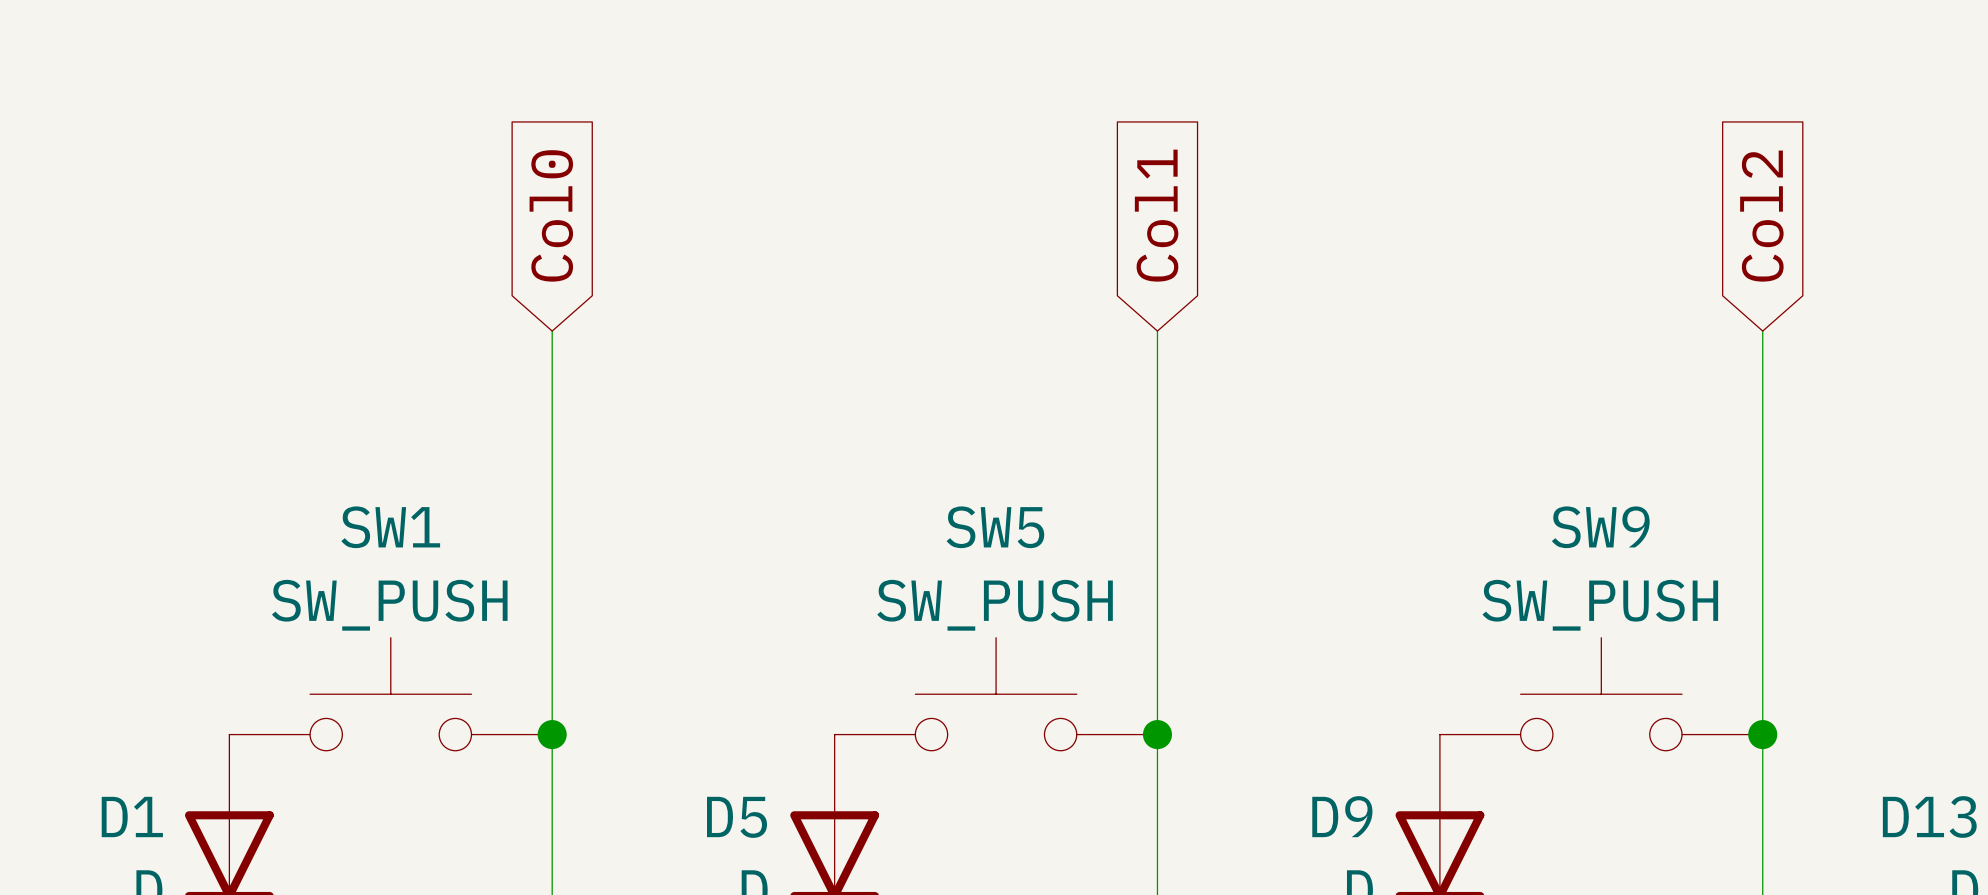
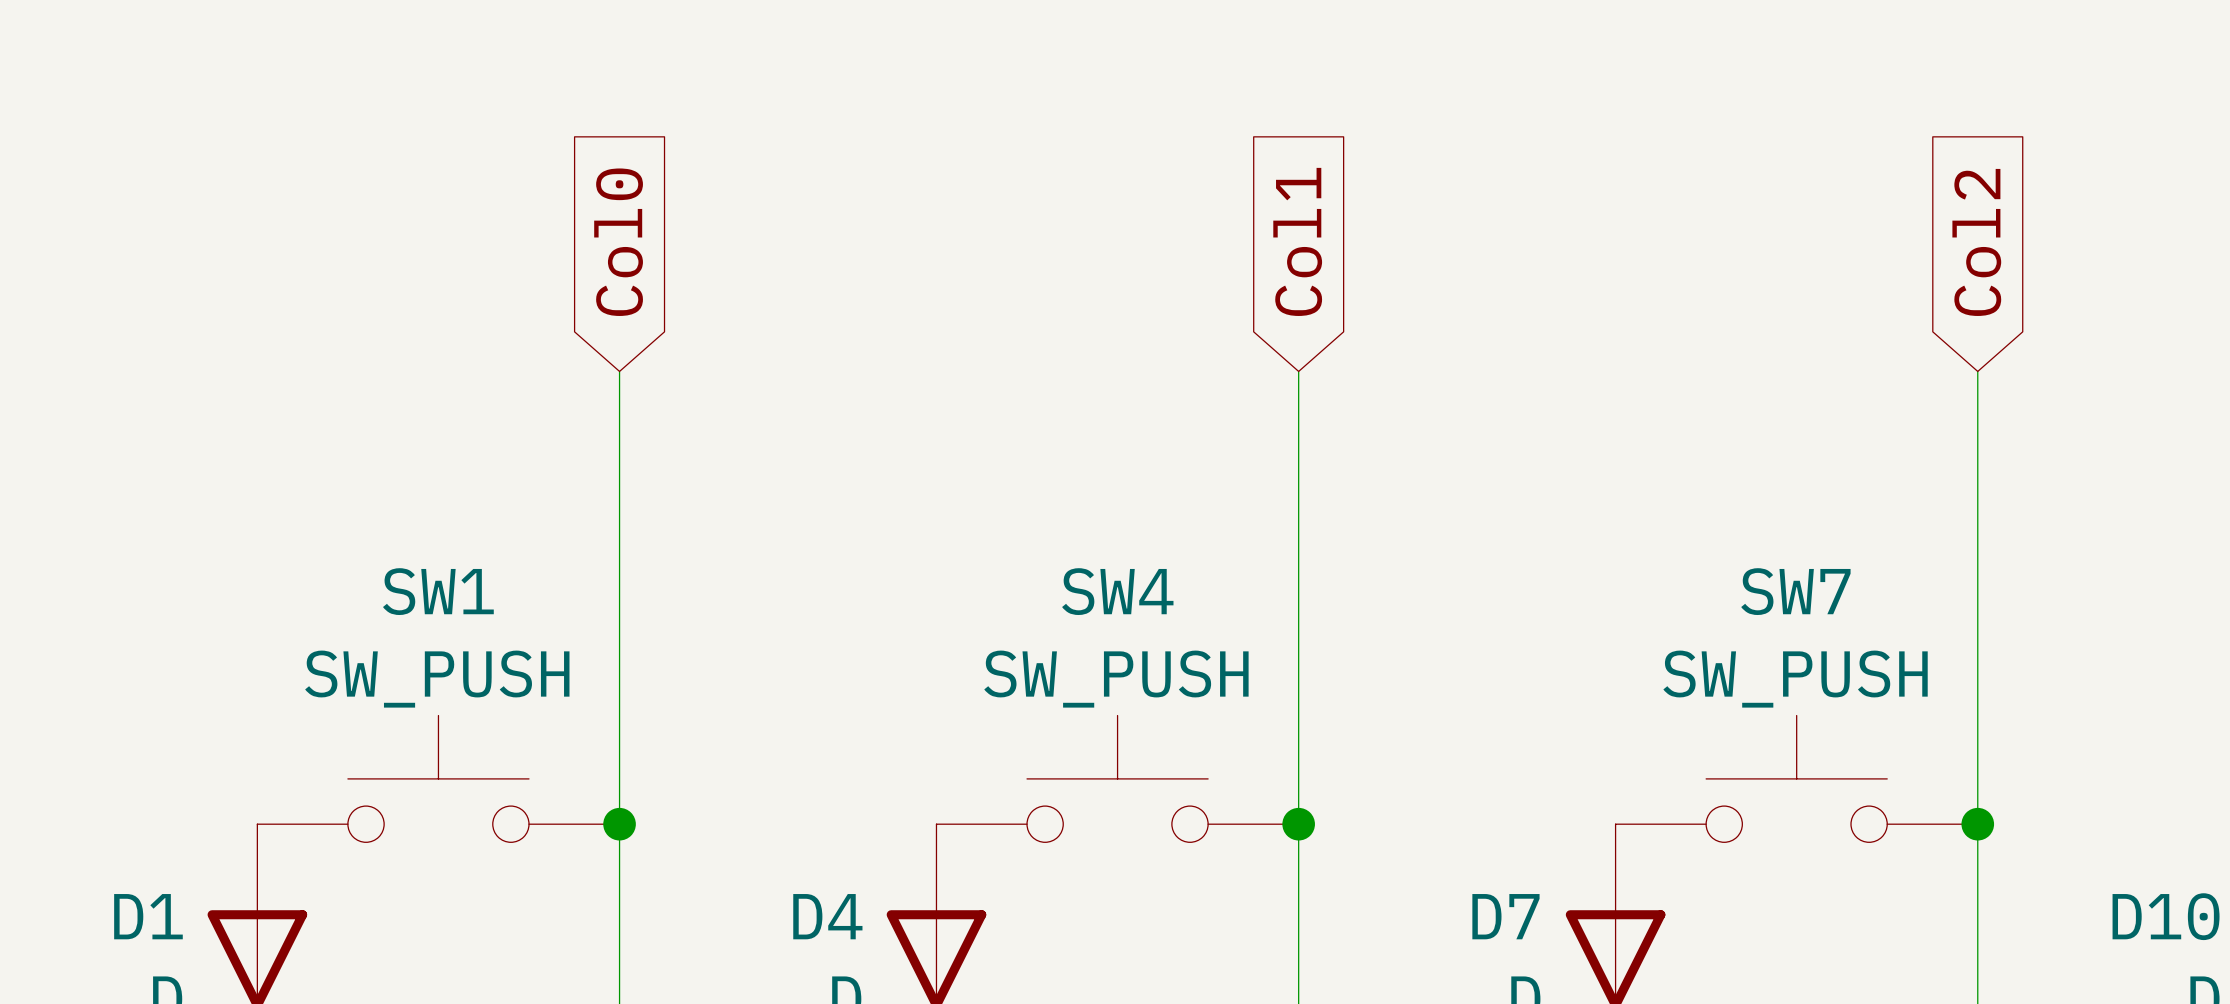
SW5 name: SW5 (995, 527) -> SW4 (1117, 591)
SW9 name: SW9 (1600, 527) -> SW7 (1795, 591)
D9 name: D9 (1342, 816) -> D7 (1505, 916)
D5 name: D5 (737, 817) -> D4 (827, 916)
D13 name: D13 (1929, 817) -> D10 (2166, 916)

